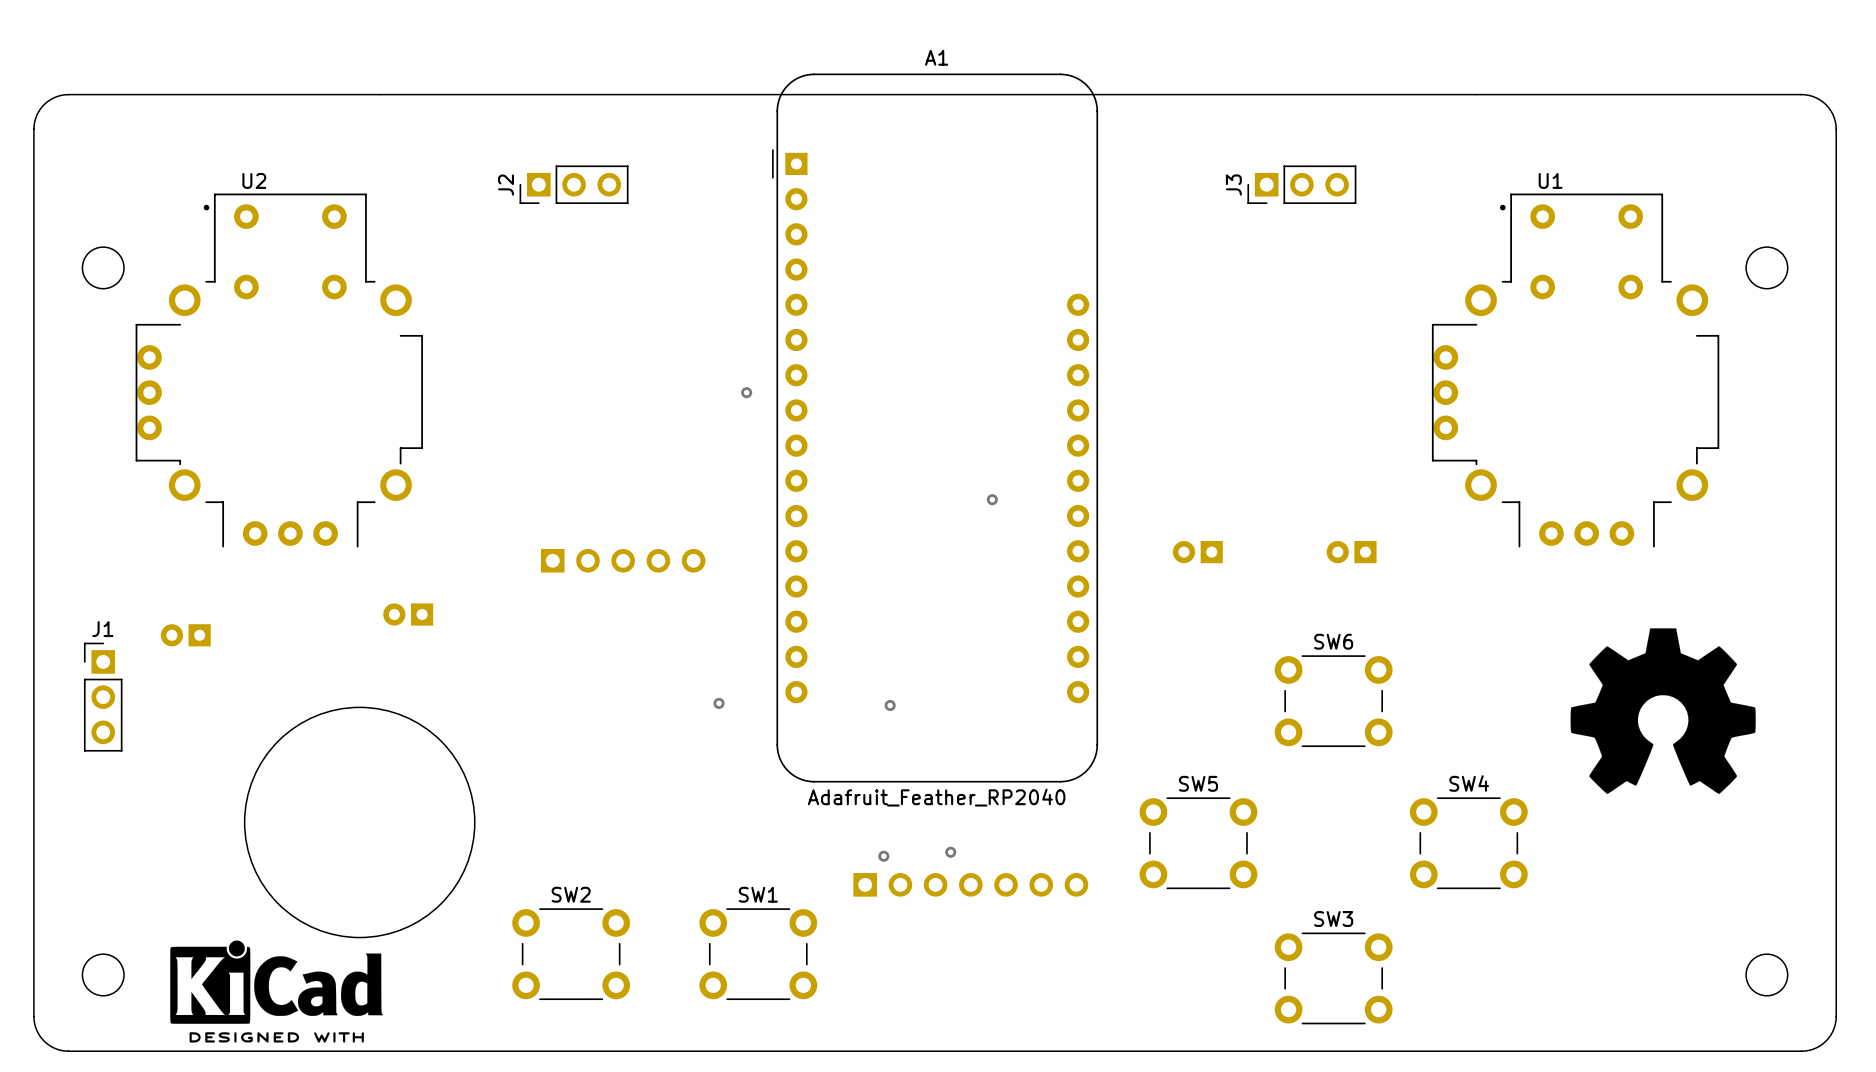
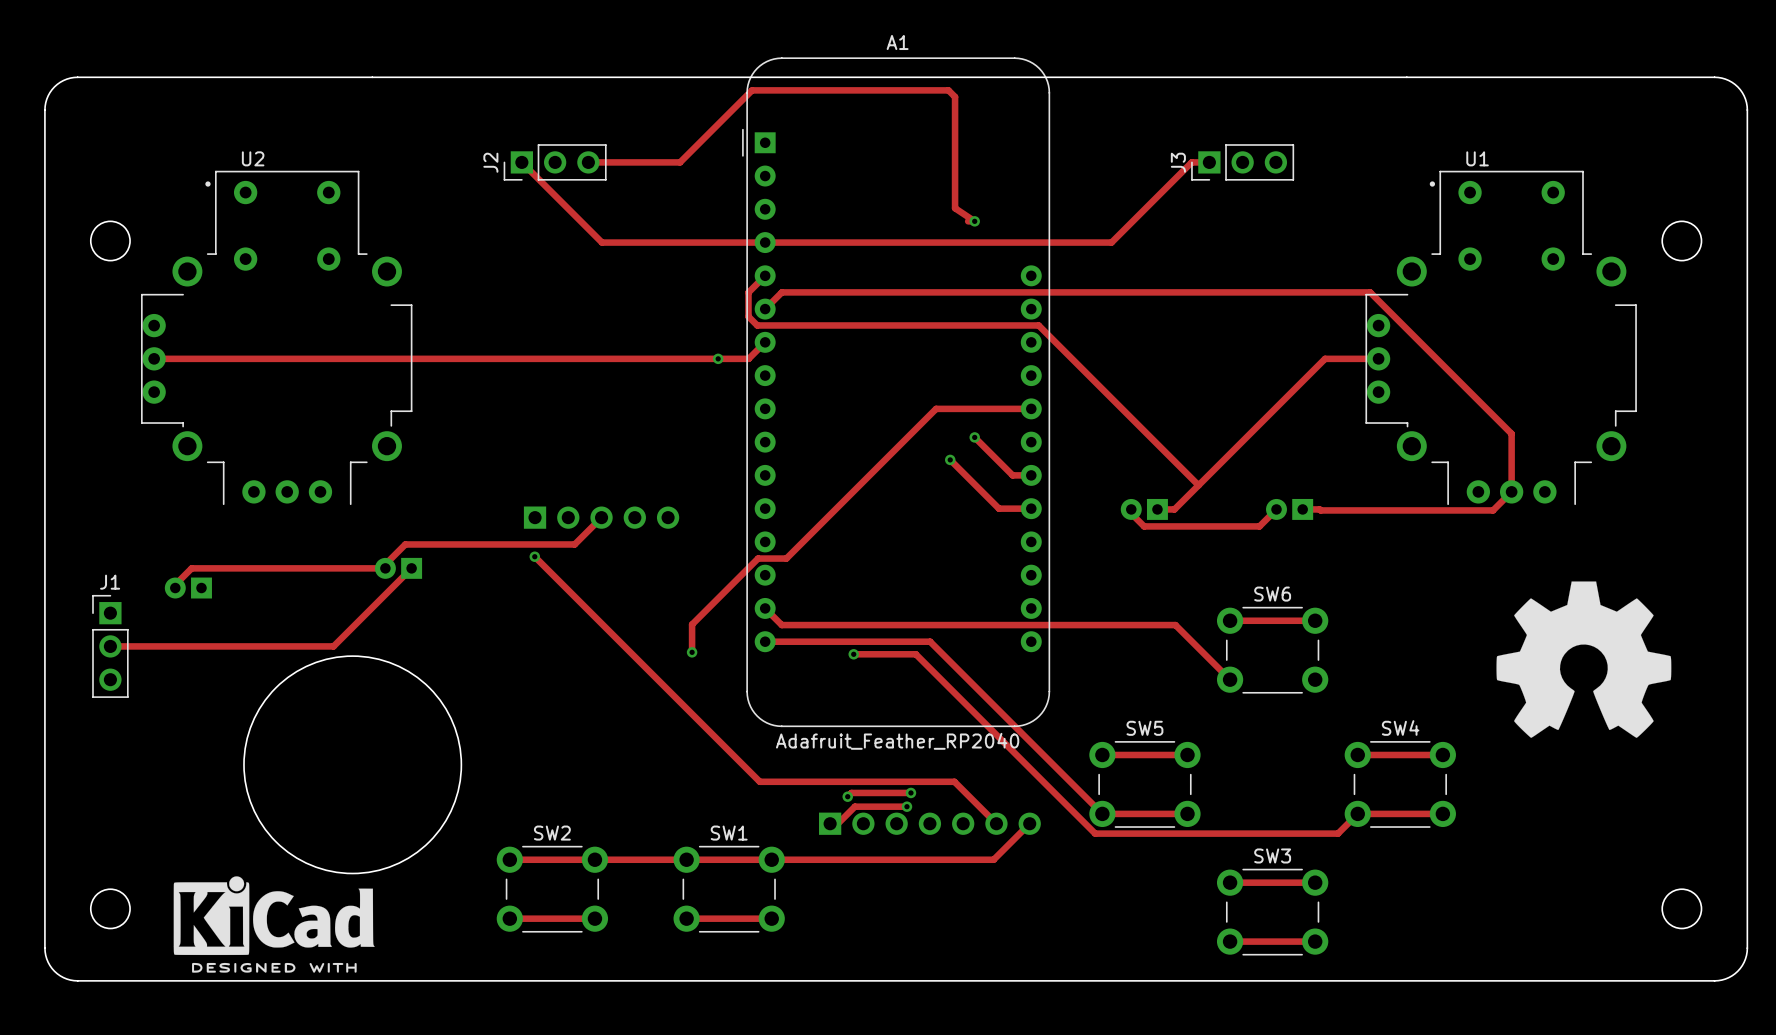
track: none -> (521, 162) (602, 242) (1111, 242) (1191, 162) (1209, 162)
track: none -> (588, 162) (680, 162) (752, 90) (948, 90) (955, 96) (955, 208) (974, 221) (968, 221)
via: none -> (974, 221)
track: none -> (765, 275) (748, 292) (748, 316) (757, 325) (1038, 325) (1198, 485)
track: none -> (765, 309) (781, 292) (1370, 292) (1511, 433) (1511, 491) (1493, 510) (1302, 509)
track: none -> (765, 342) (748, 358) (154, 358)
track: none -> (1378, 358) (1325, 358) (1174, 509) (1157, 509)
track: none -> (1031, 408) (936, 408) (786, 558) (758, 558) (692, 624) (692, 652)
track: none -> (974, 437) (1012, 475) (1031, 475)
via: none -> (974, 437)
track: none -> (950, 459) (998, 508) (1031, 508)
track: none -> (1131, 509) (1131, 513) (1144, 526) (1259, 526) (1276, 509)
track: none -> (601, 517) (574, 544) (405, 544) (385, 564) (385, 568) (191, 568) (175, 584) (175, 588)
track: none -> (534, 556) (759, 781) (954, 781) (996, 823)
via: none -> (534, 556)
track: none -> (411, 568) (333, 646) (110, 646)
track: none -> (765, 608) (781, 625) (1175, 625) (1230, 679)
track: none -> (1230, 620) (1315, 620)
track: none -> (765, 641) (930, 641) (1102, 813) (1187, 813)
track: none -> (853, 654) (915, 654) (1095, 833) (1338, 833) (1357, 813) (1442, 813)
track: none -> (1102, 754) (1187, 754)
track: none -> (1357, 754) (1442, 754)
track: none -> (910, 792) (851, 792) (847, 796)
track: none -> (906, 806) (854, 806) (837, 823) (830, 823)
via: none -> (906, 806)
track: none -> (1029, 823) (993, 859) (509, 859)
track: none -> (1230, 882) (1315, 882)
track: none -> (509, 918) (594, 918)
track: none -> (686, 918) (771, 918)
track: none -> (1230, 941) (1315, 941)

